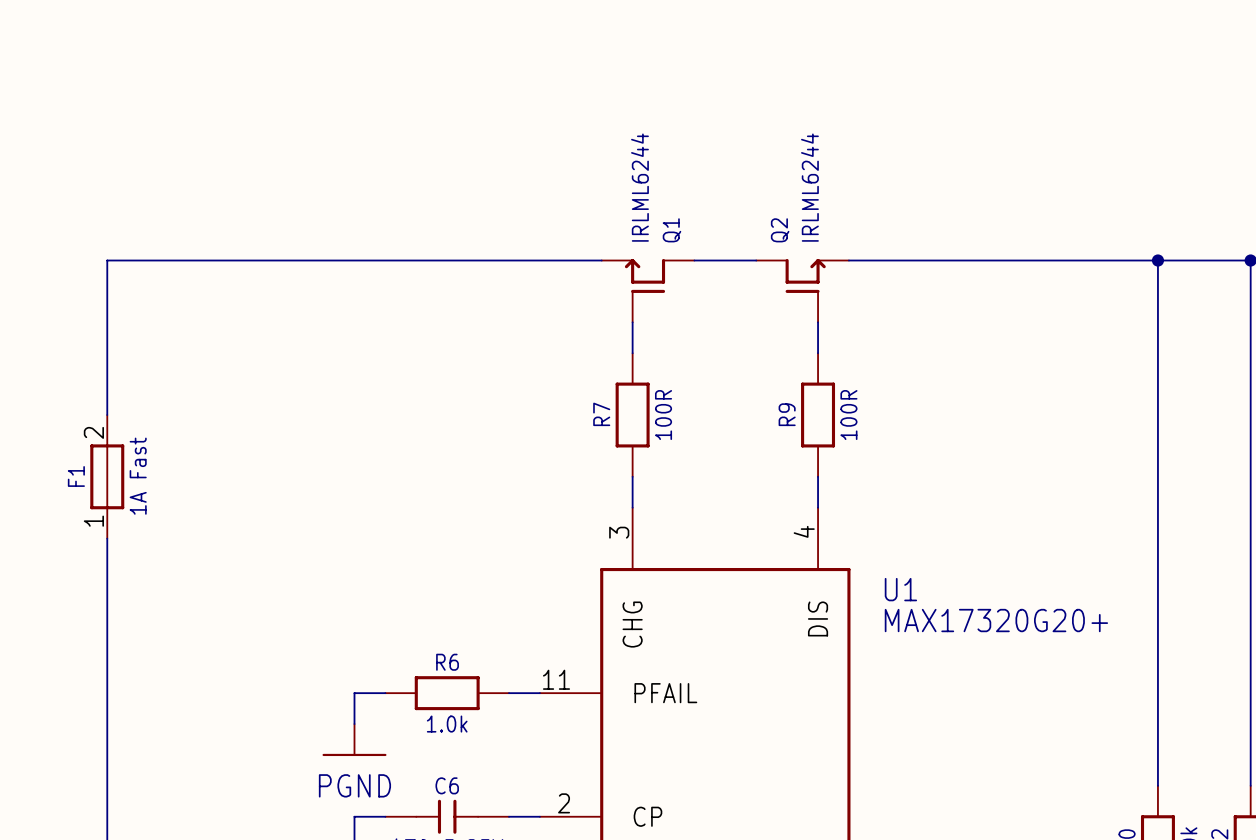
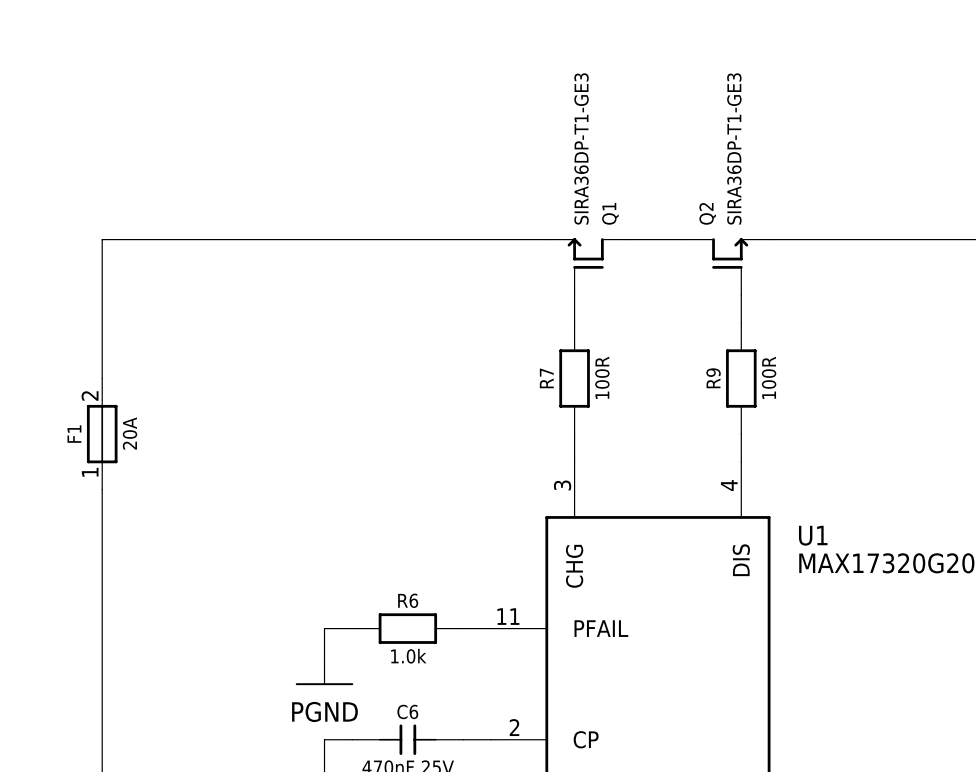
Q1 value: IRLML6244 (639, 187) -> SIRA36DP-T1-GE3 (581, 148)
Q2 value: IRLML6244 (809, 187) -> SIRA36DP-T1-GE3 (734, 148)
F1 value: 1A Fast (138, 476) -> 20A (130, 433)

